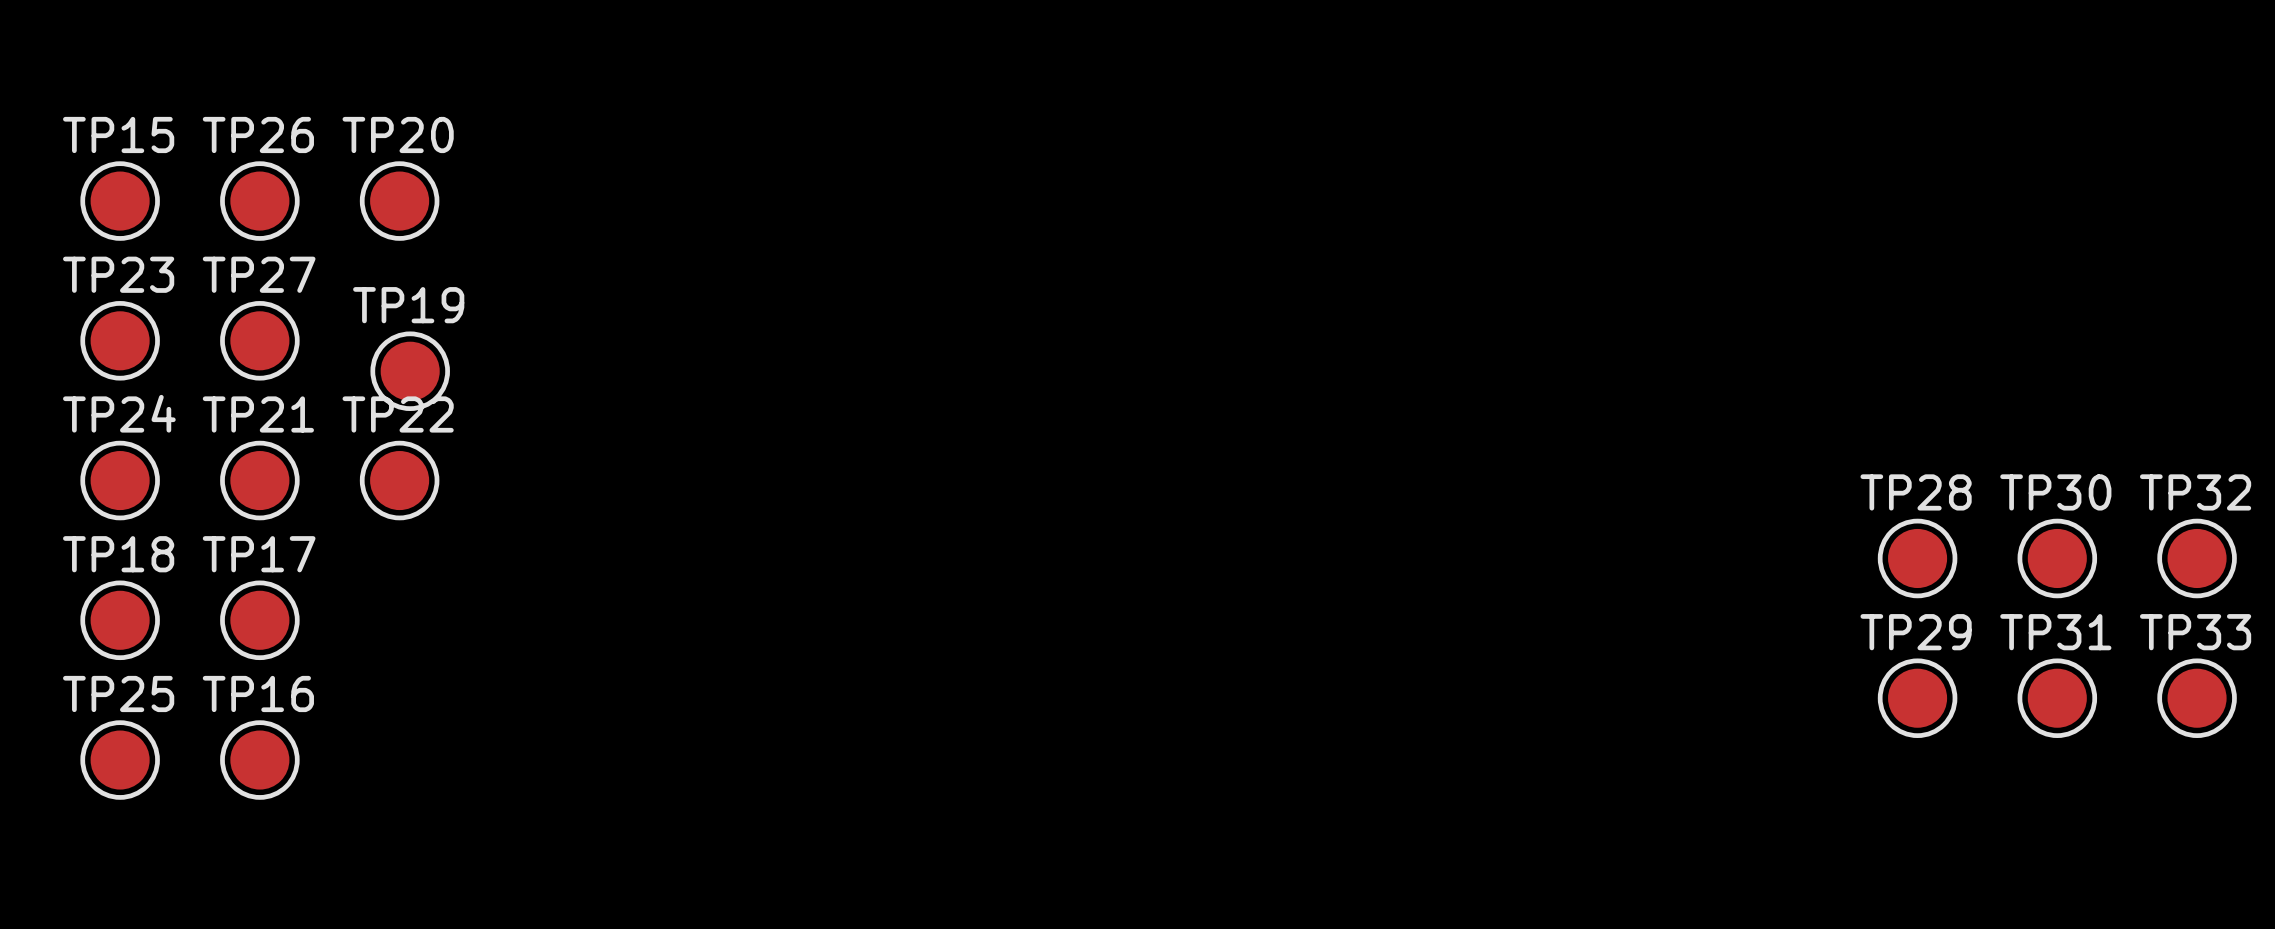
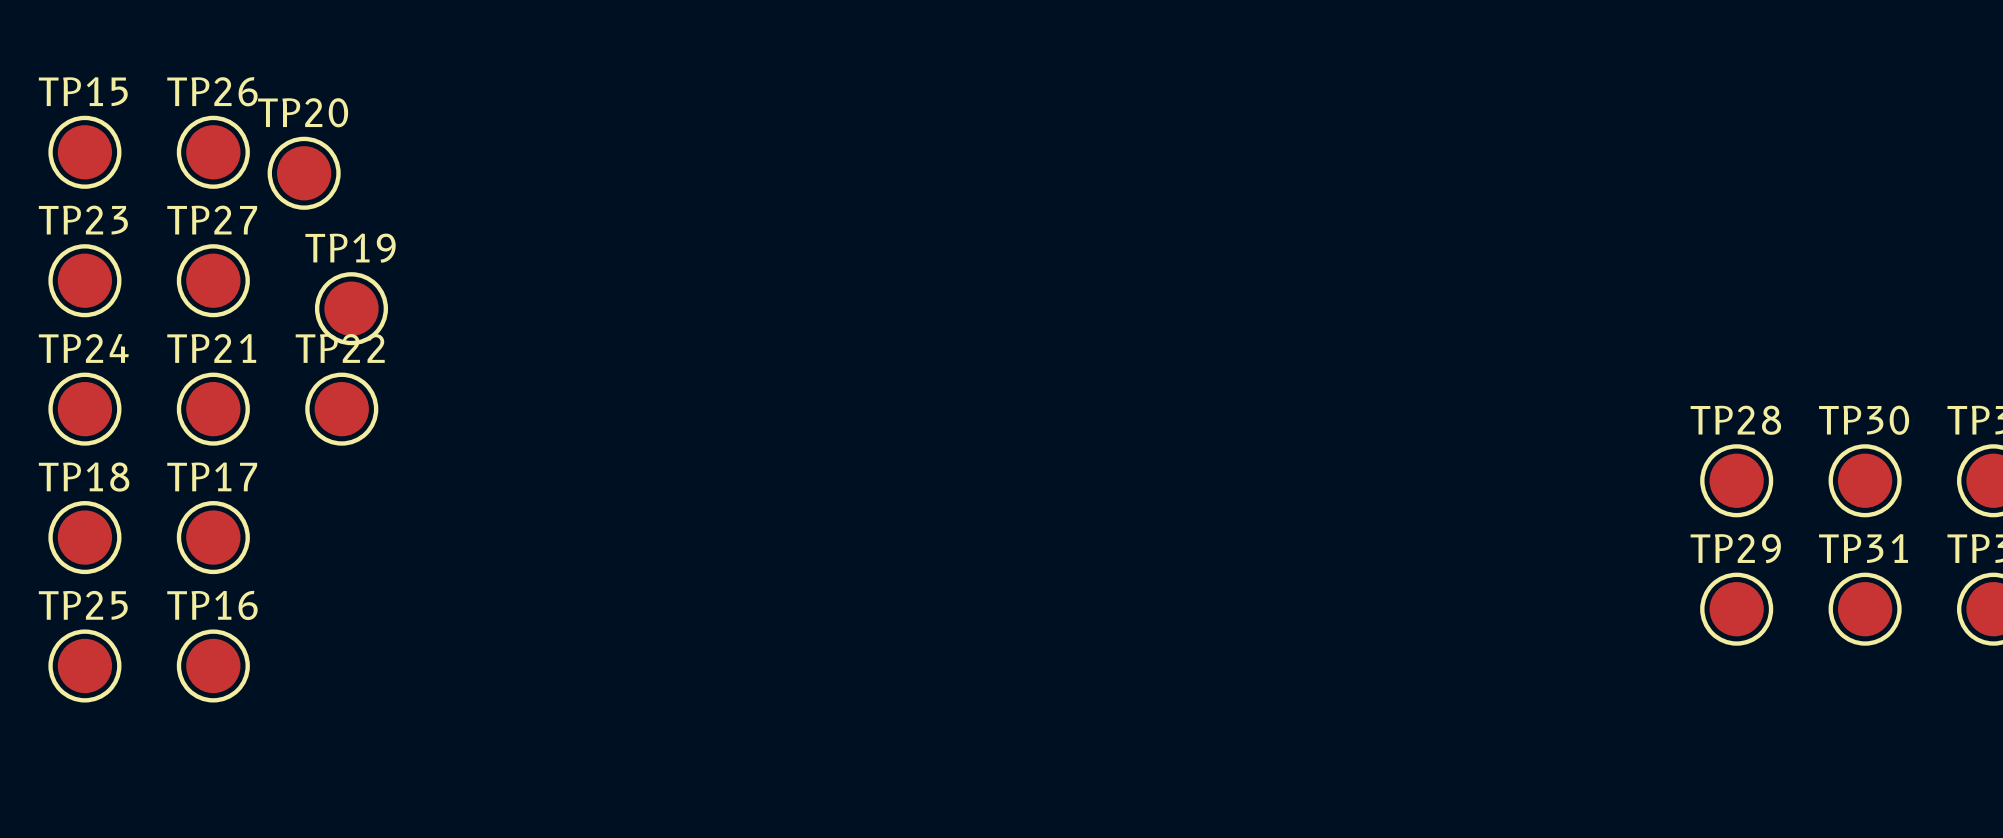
TP20 position: (399, 201) -> (304, 173)

